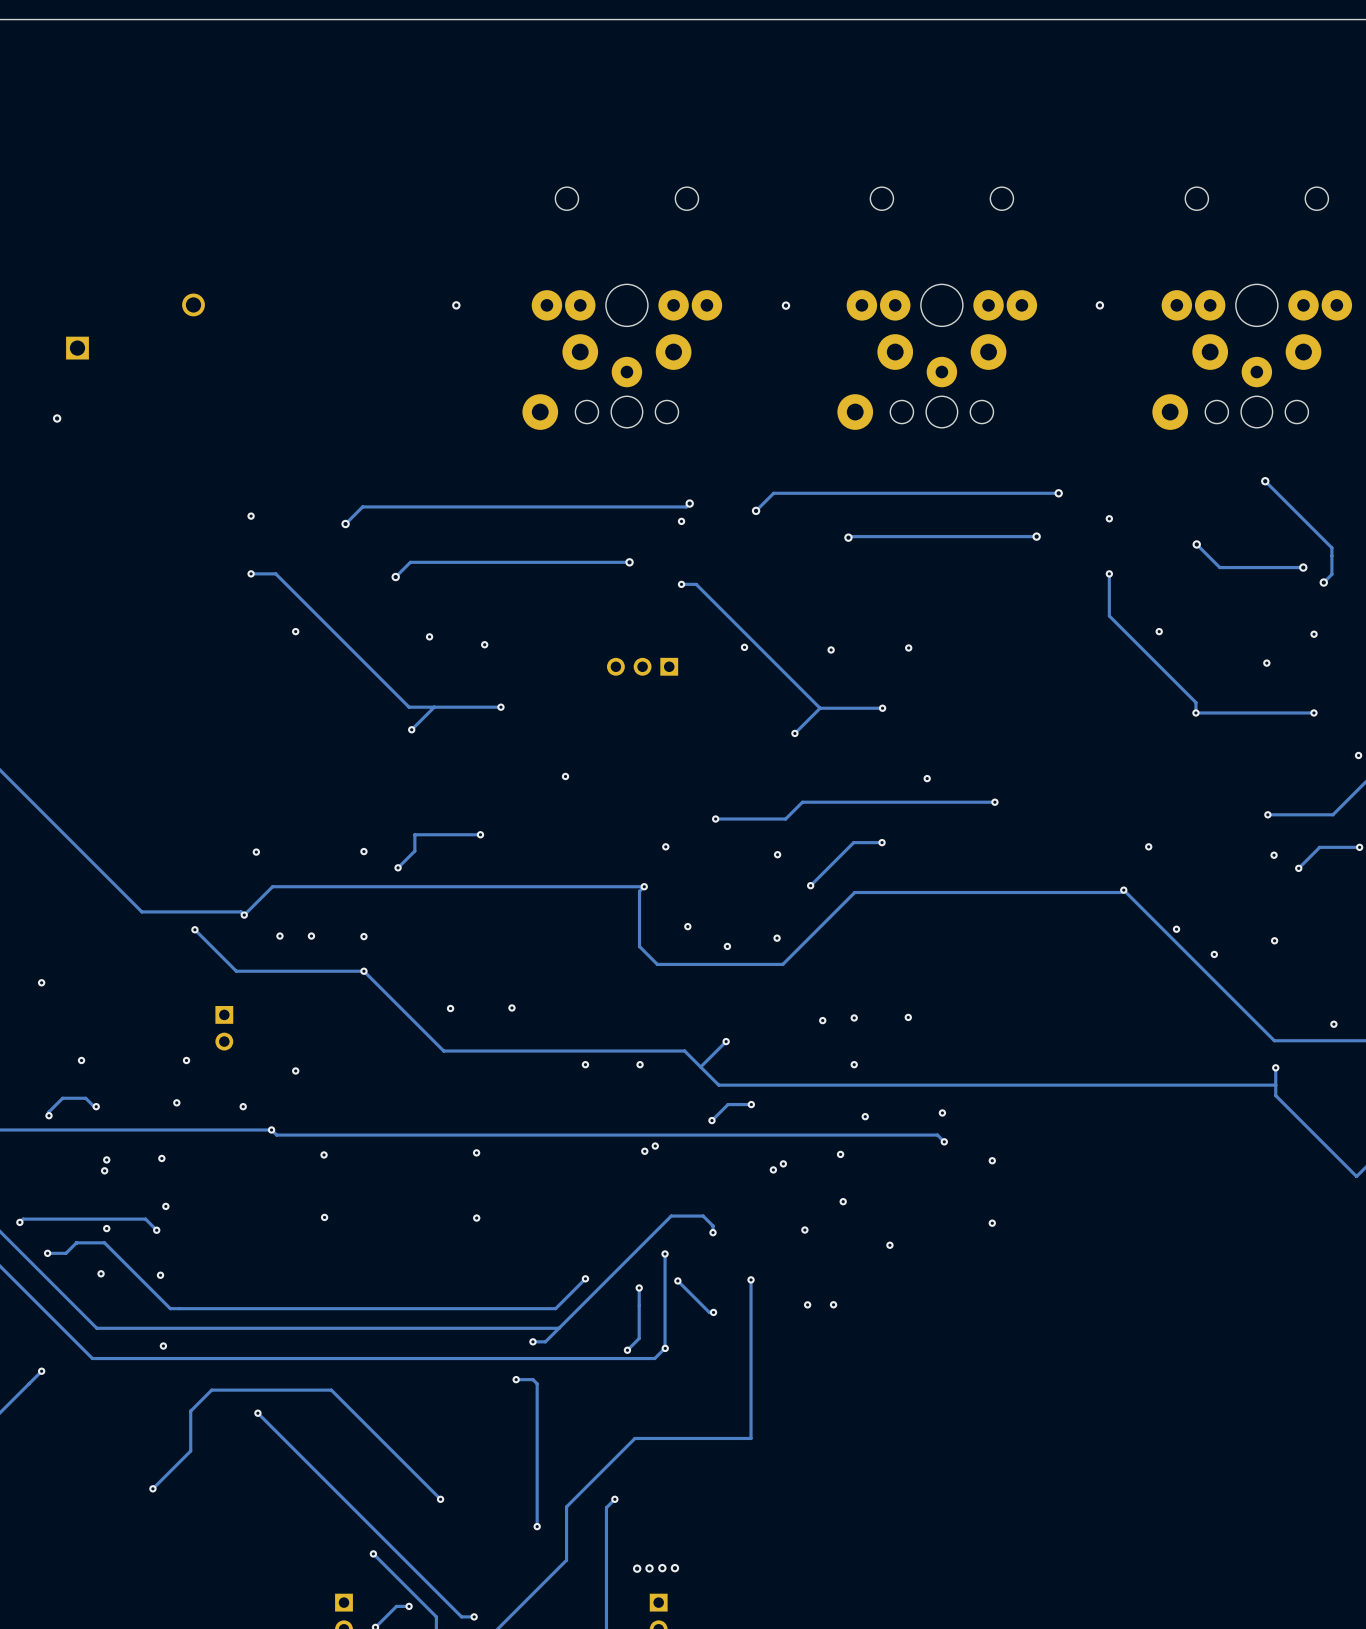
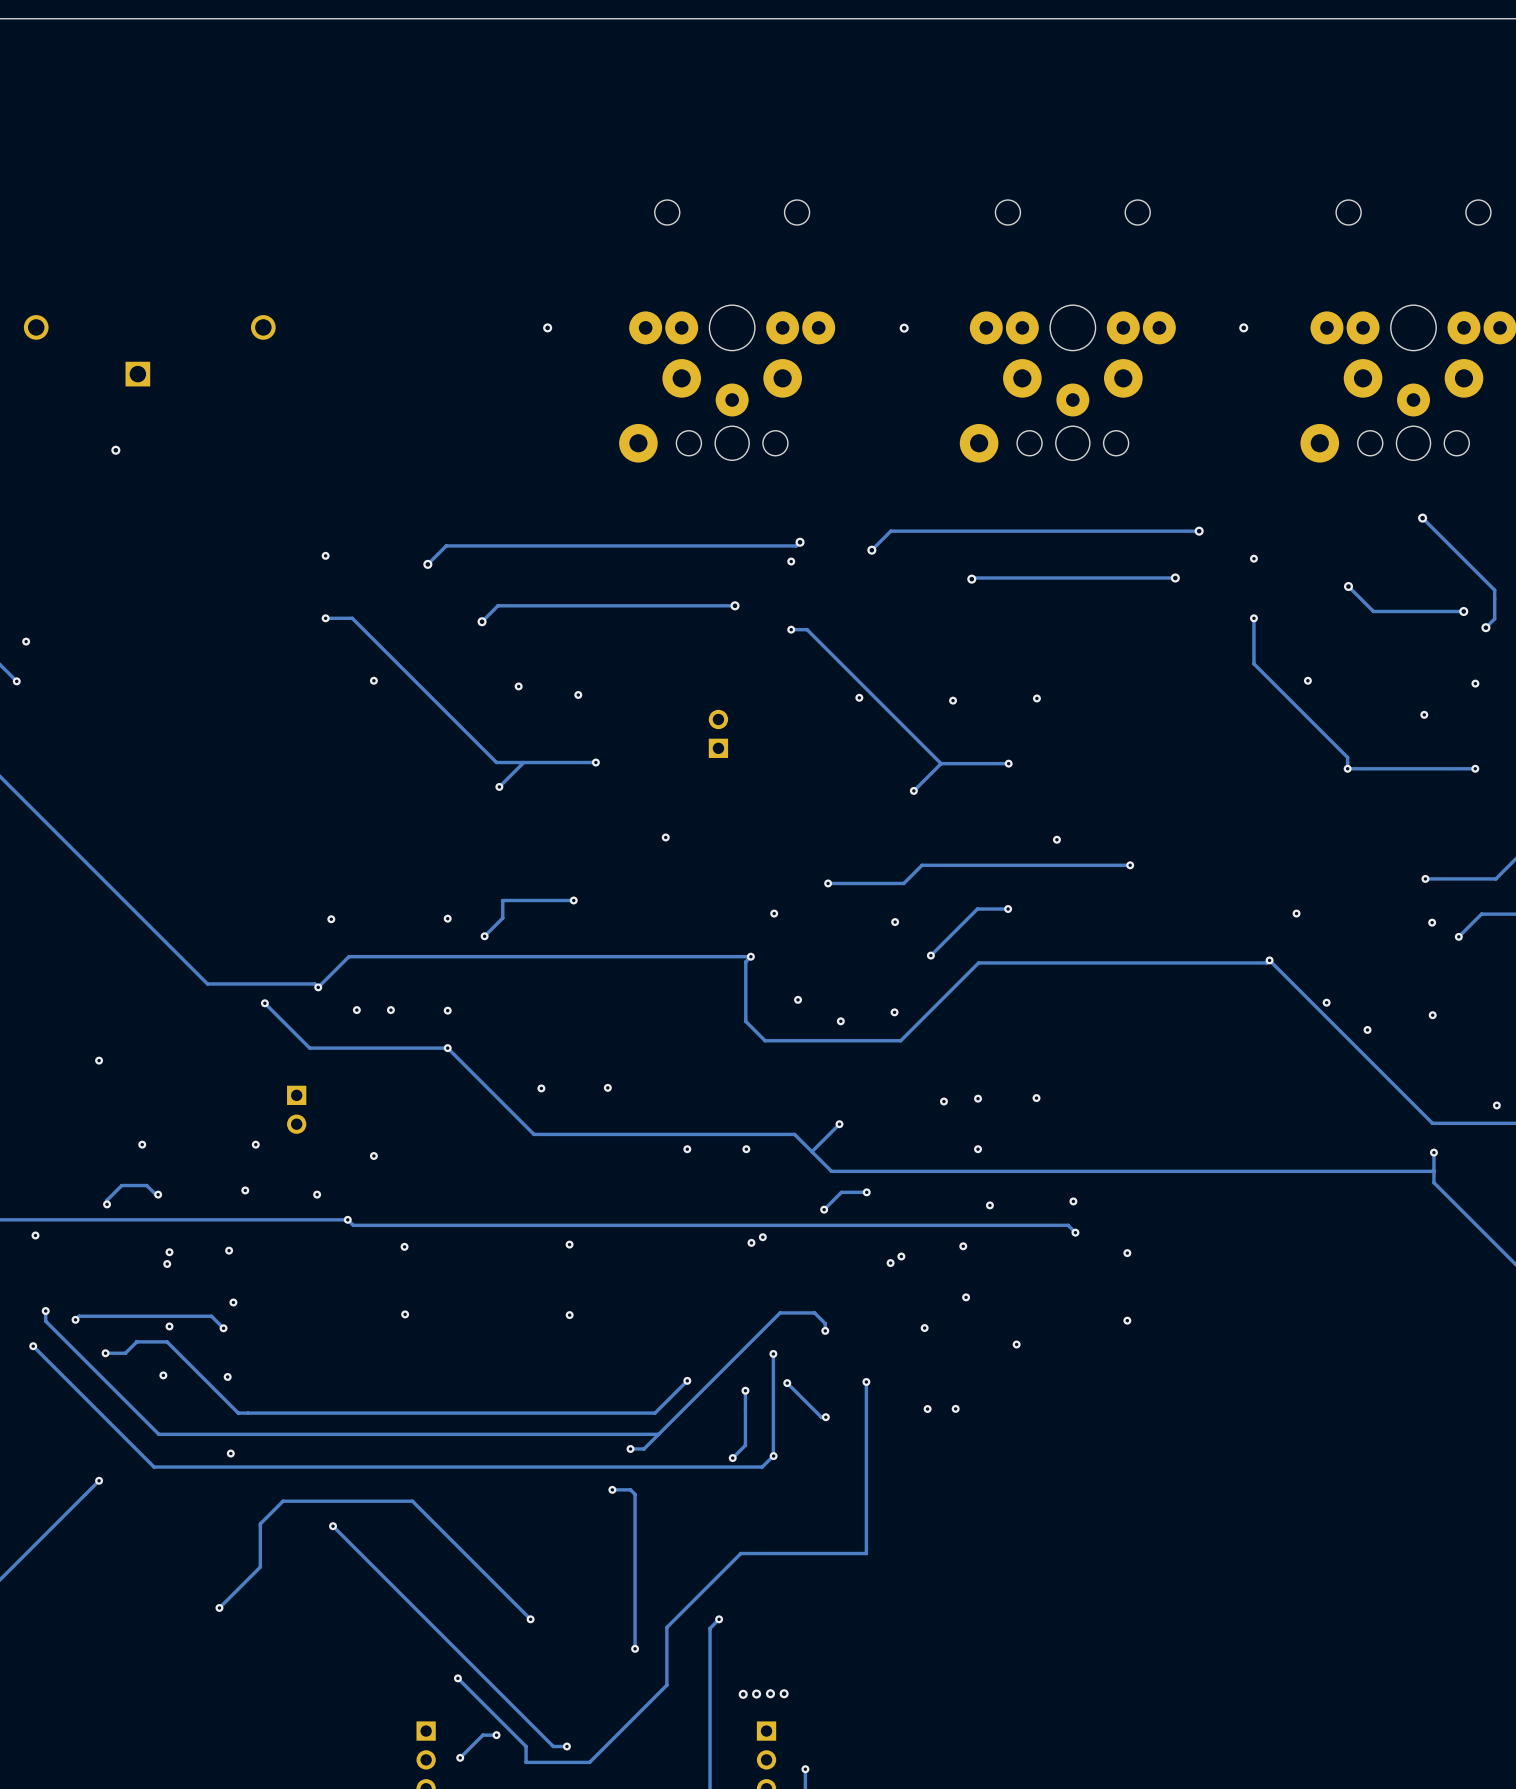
part: (642, 666) -> none
part: none -> (718, 733)

